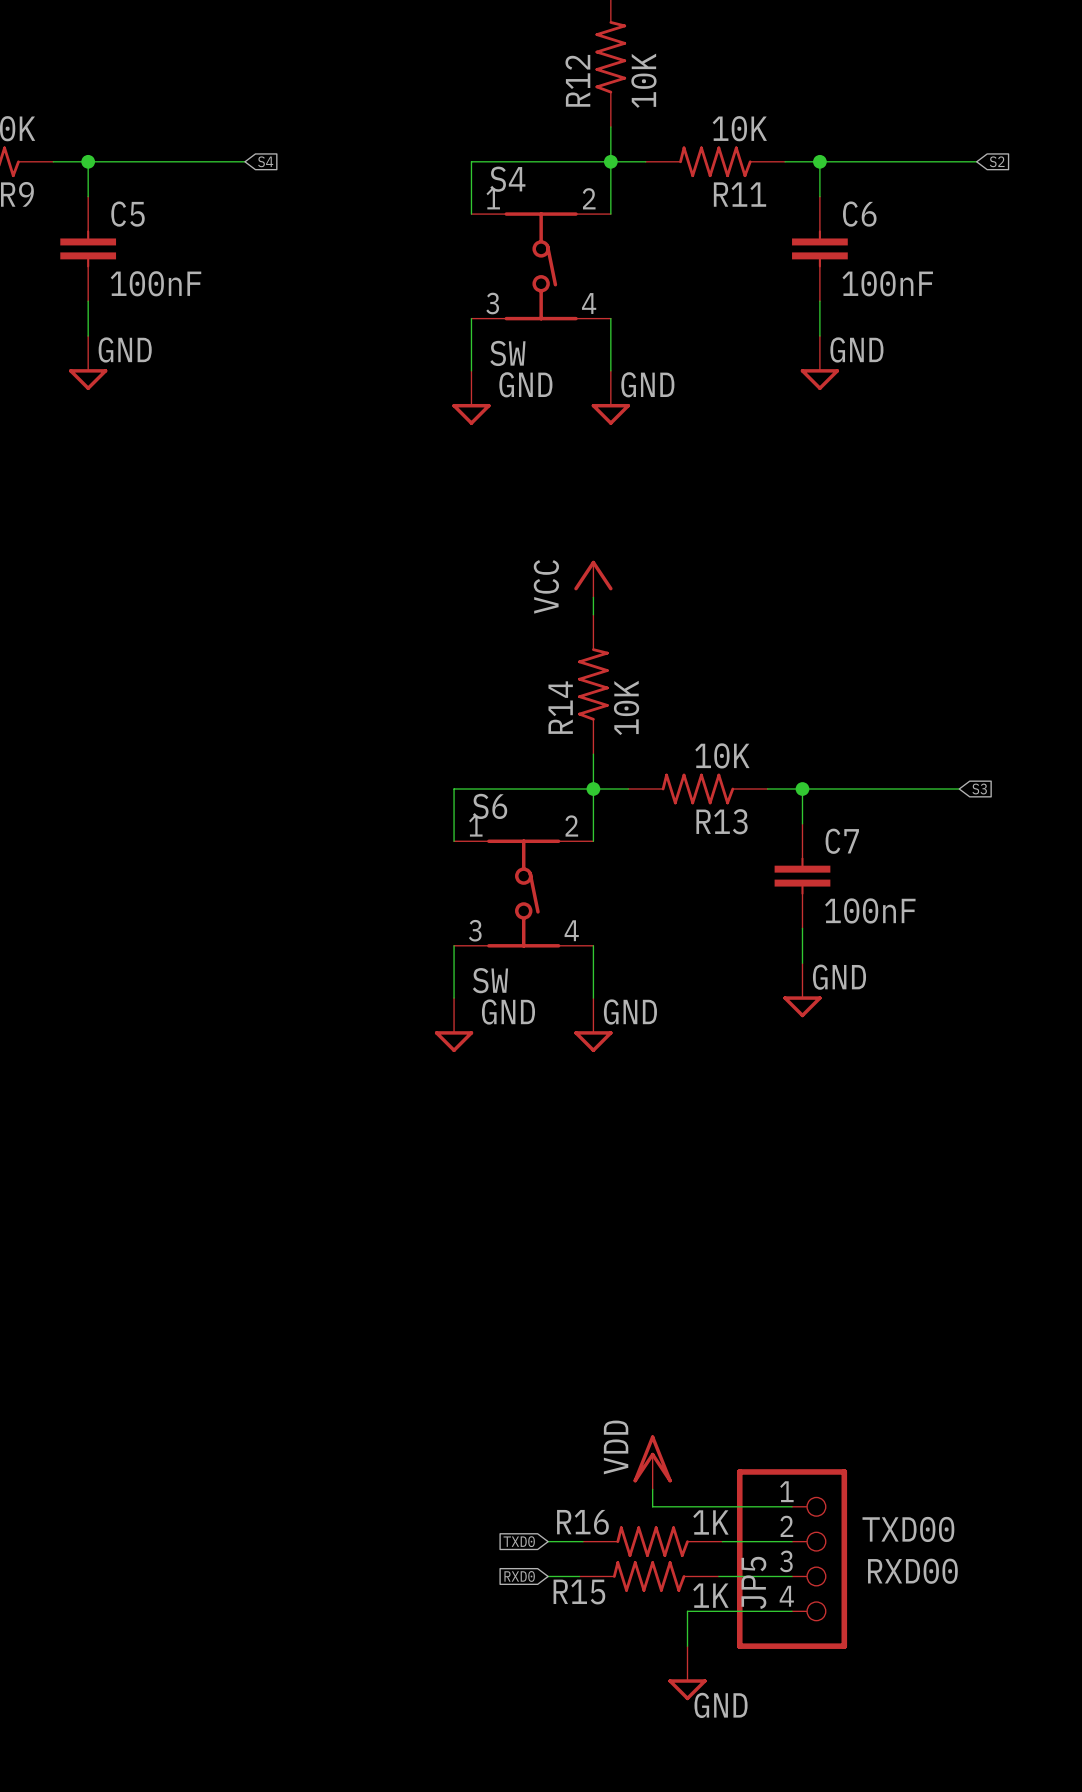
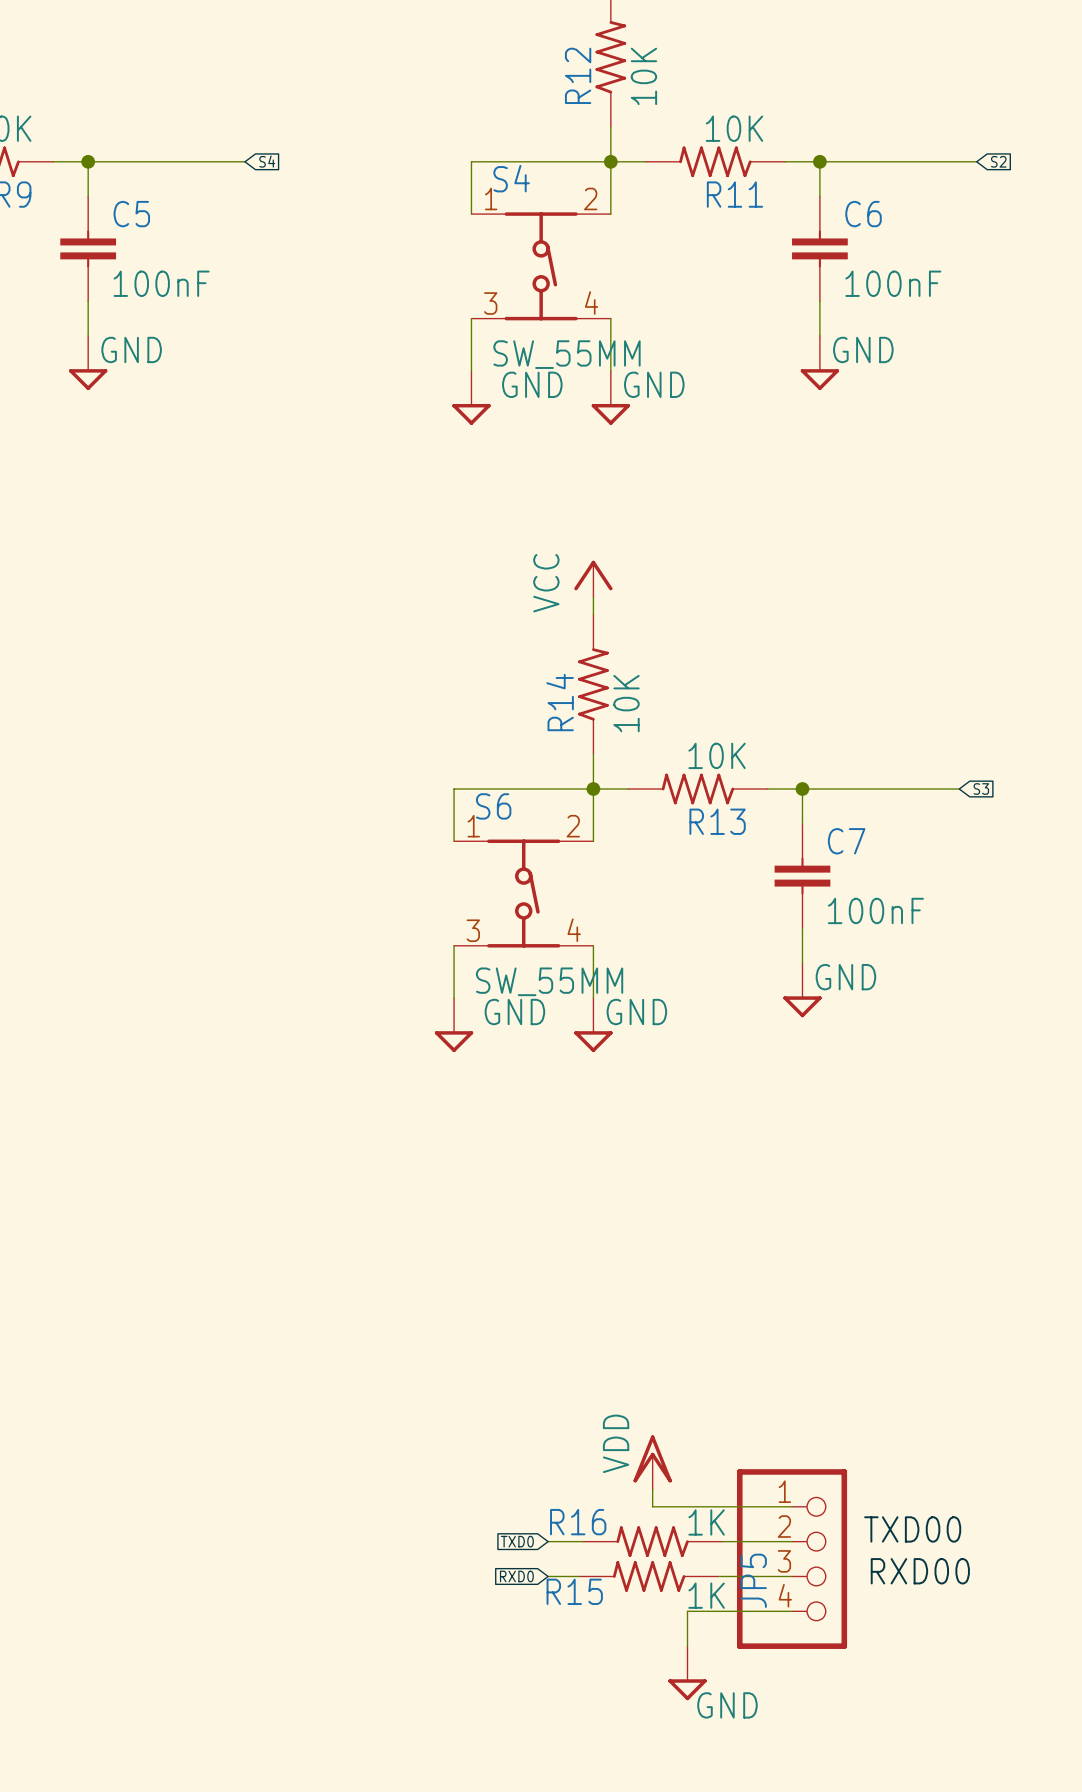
S4 value: SW (507, 353) -> SW_55MM (567, 354)
S6 value: SW (490, 980) -> SW_55MM (549, 981)

